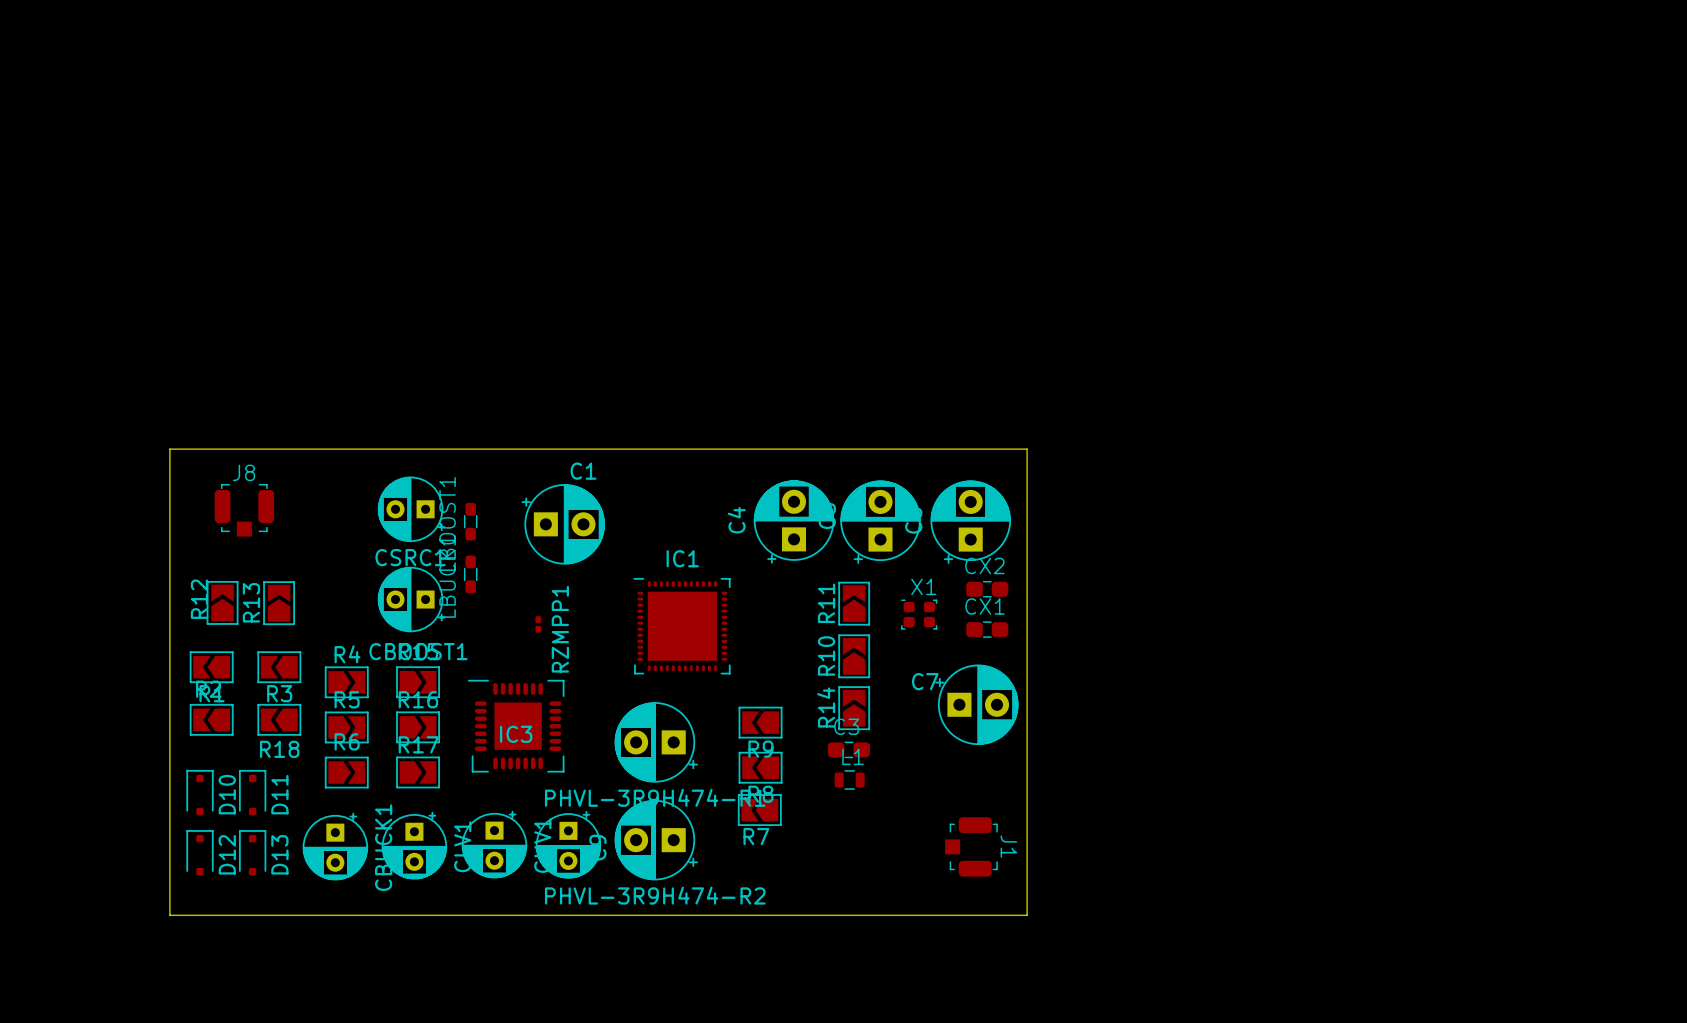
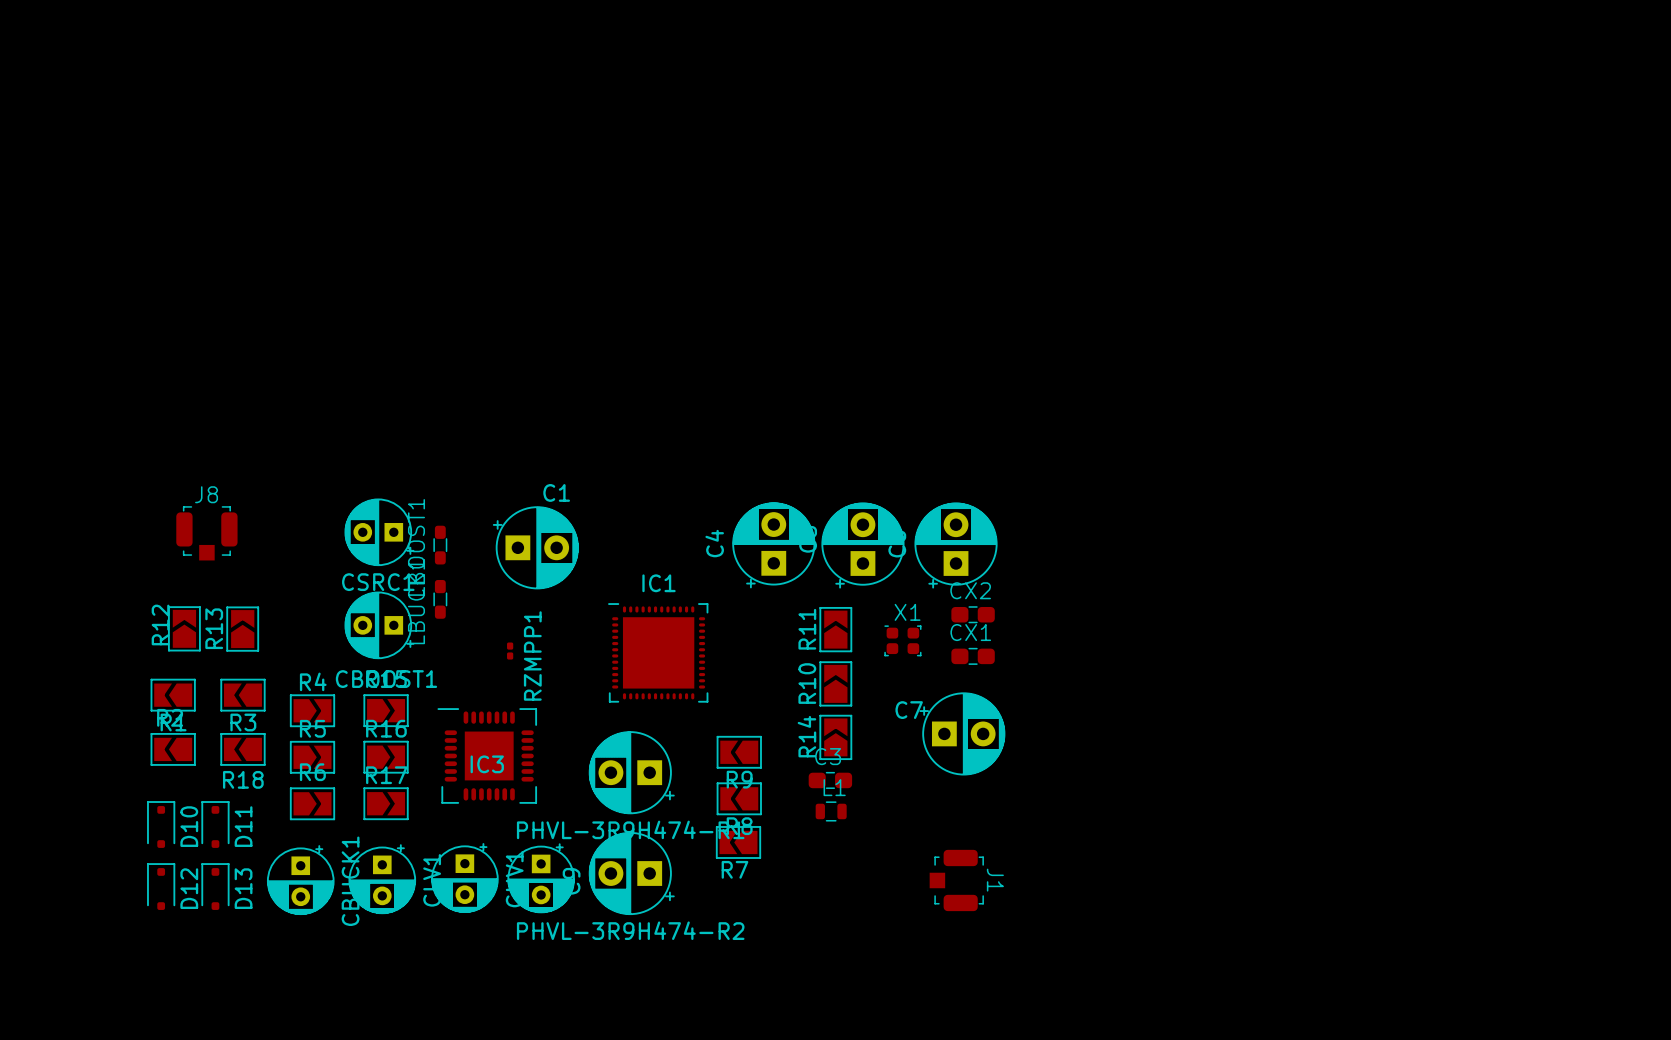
board edge: (169, 449) (1027, 449) (1027, 915) (169, 915) (169, 449) -> none

